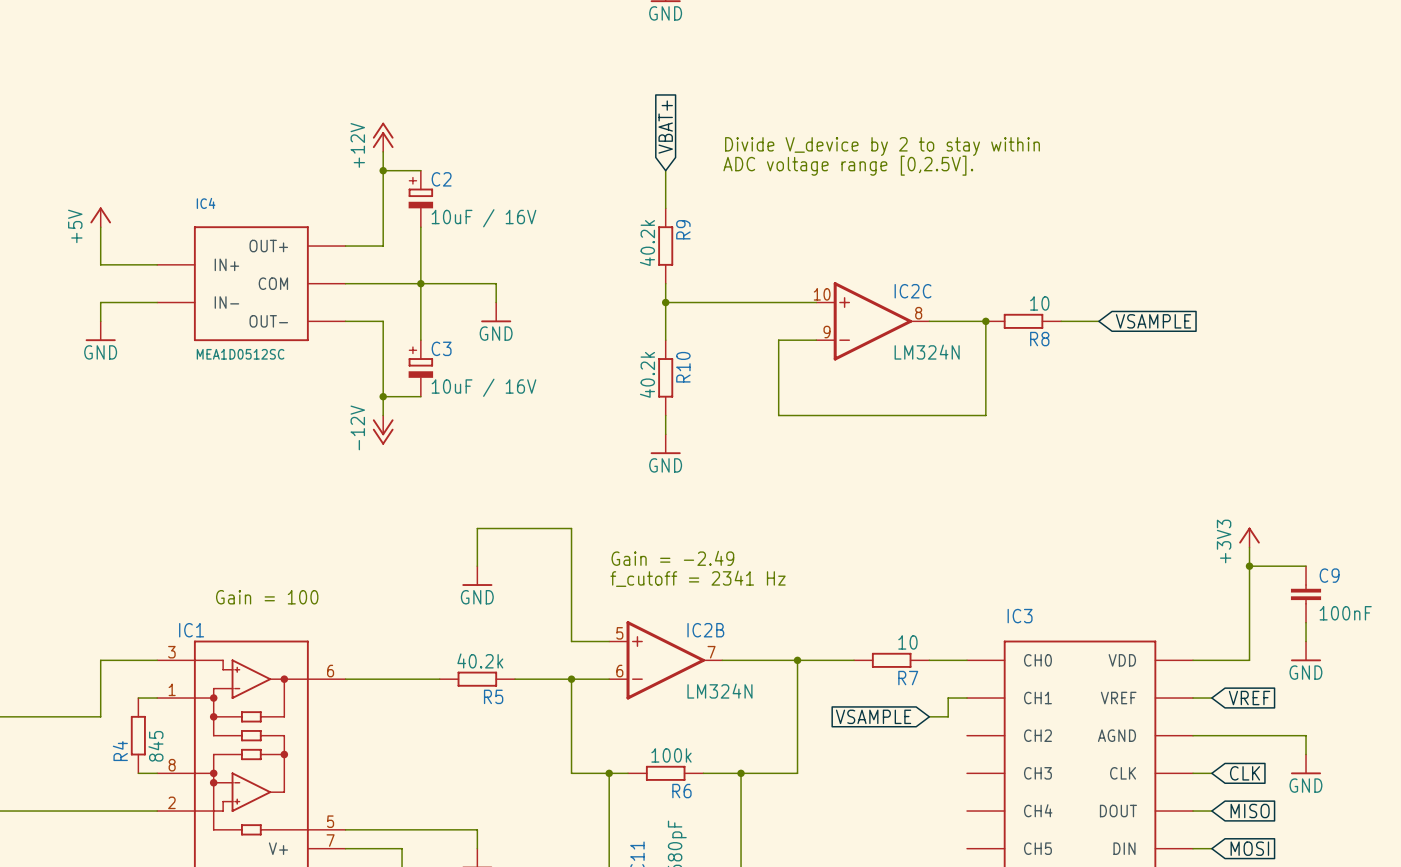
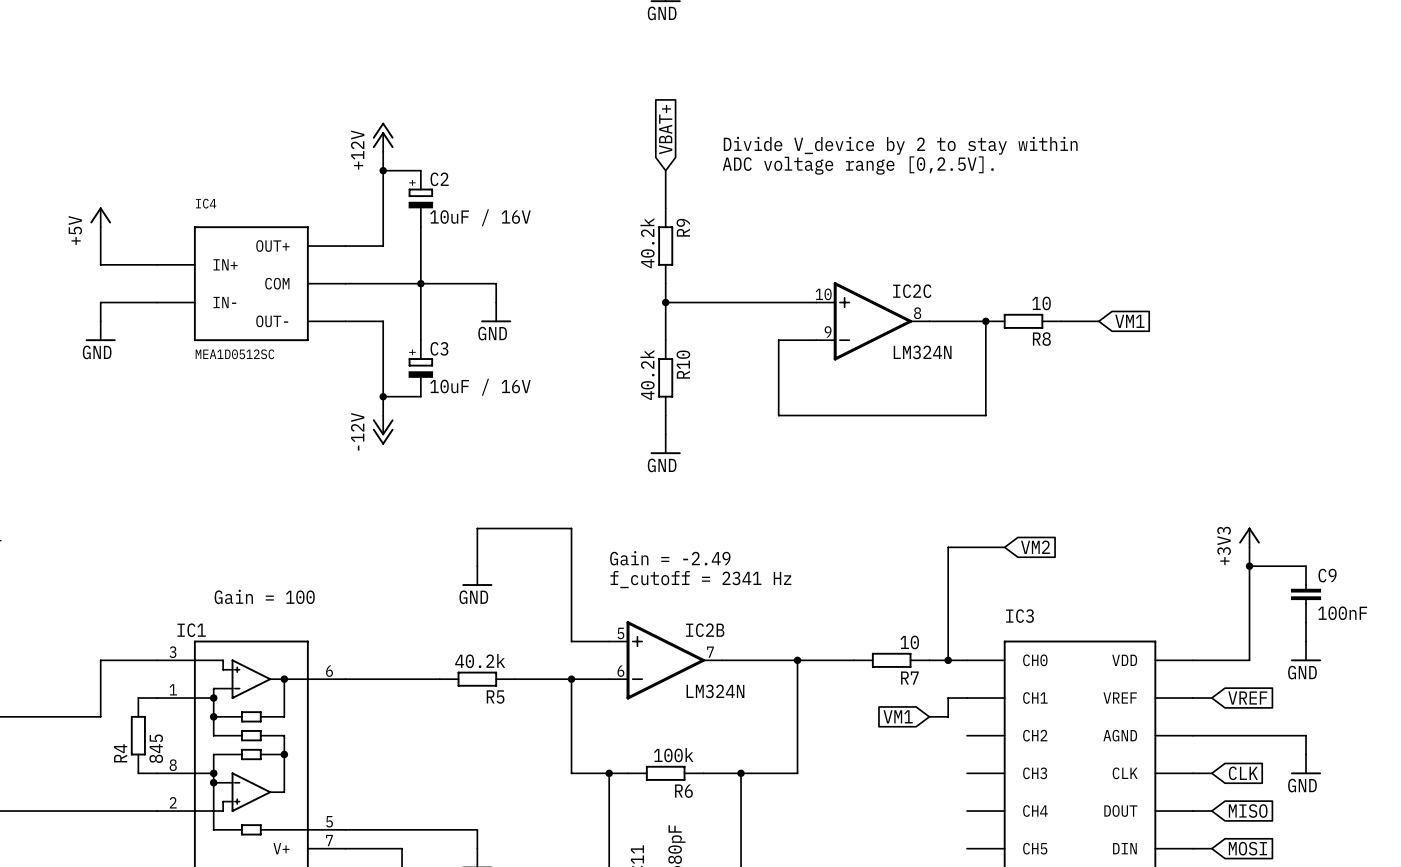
global label: VSAMPLE (1153, 321) -> VM1 (1129, 321)
wire: none -> (1004, 547) (948, 547) (948, 660)
global label: none -> VM2 (1035, 547)
junction: none -> (948, 660)
global label: VSAMPLE (873, 716) -> VM1 (898, 716)

